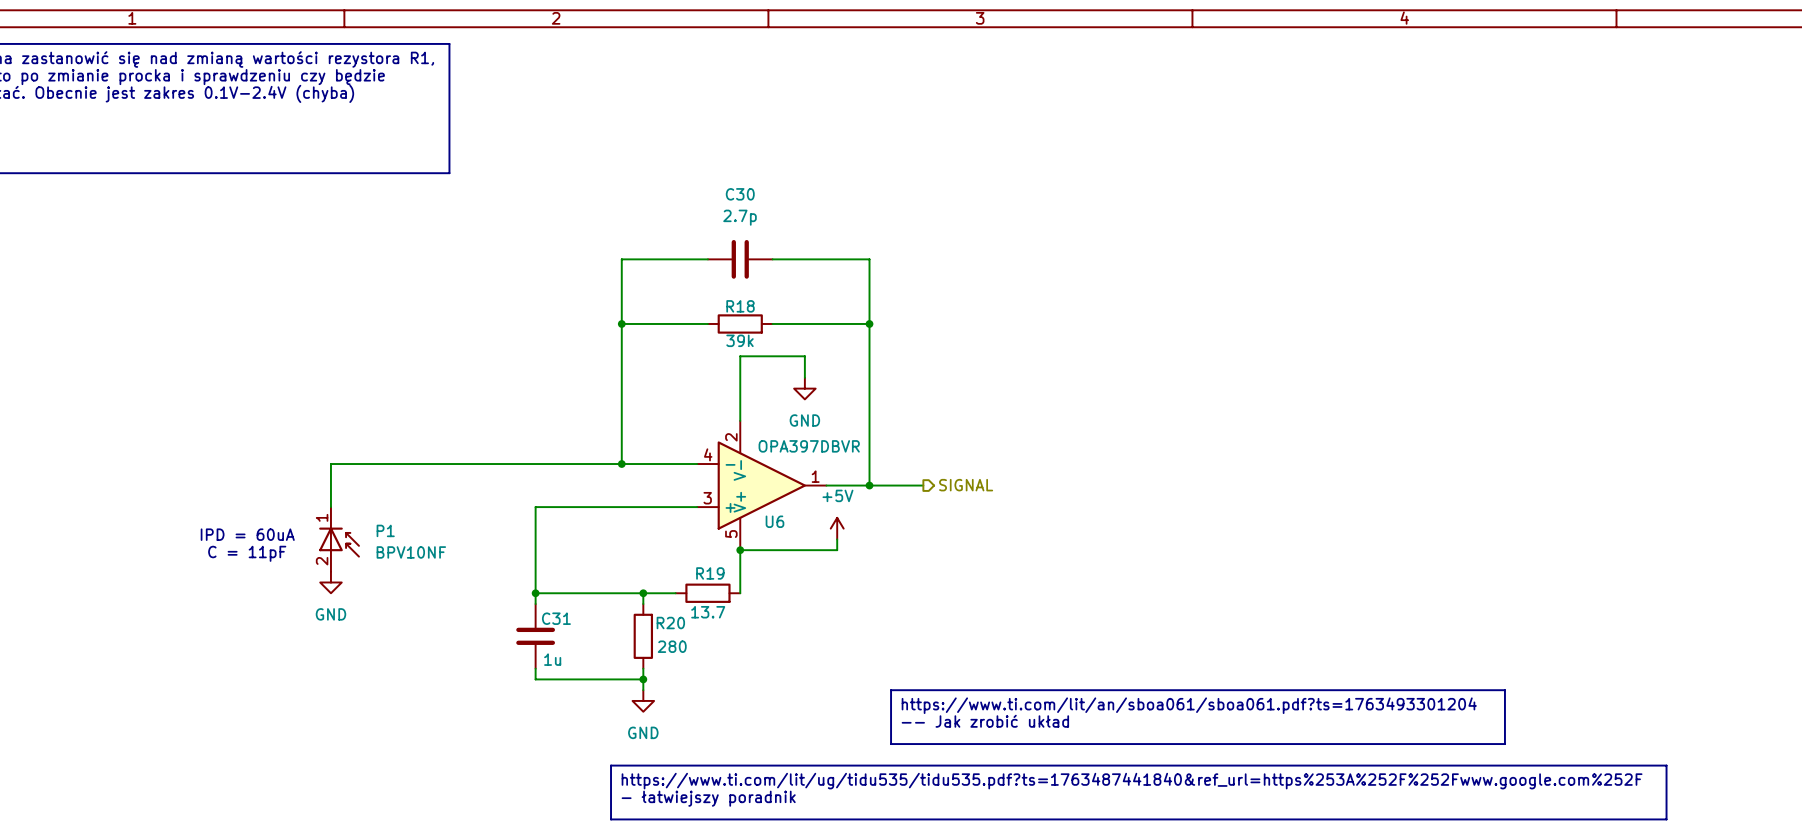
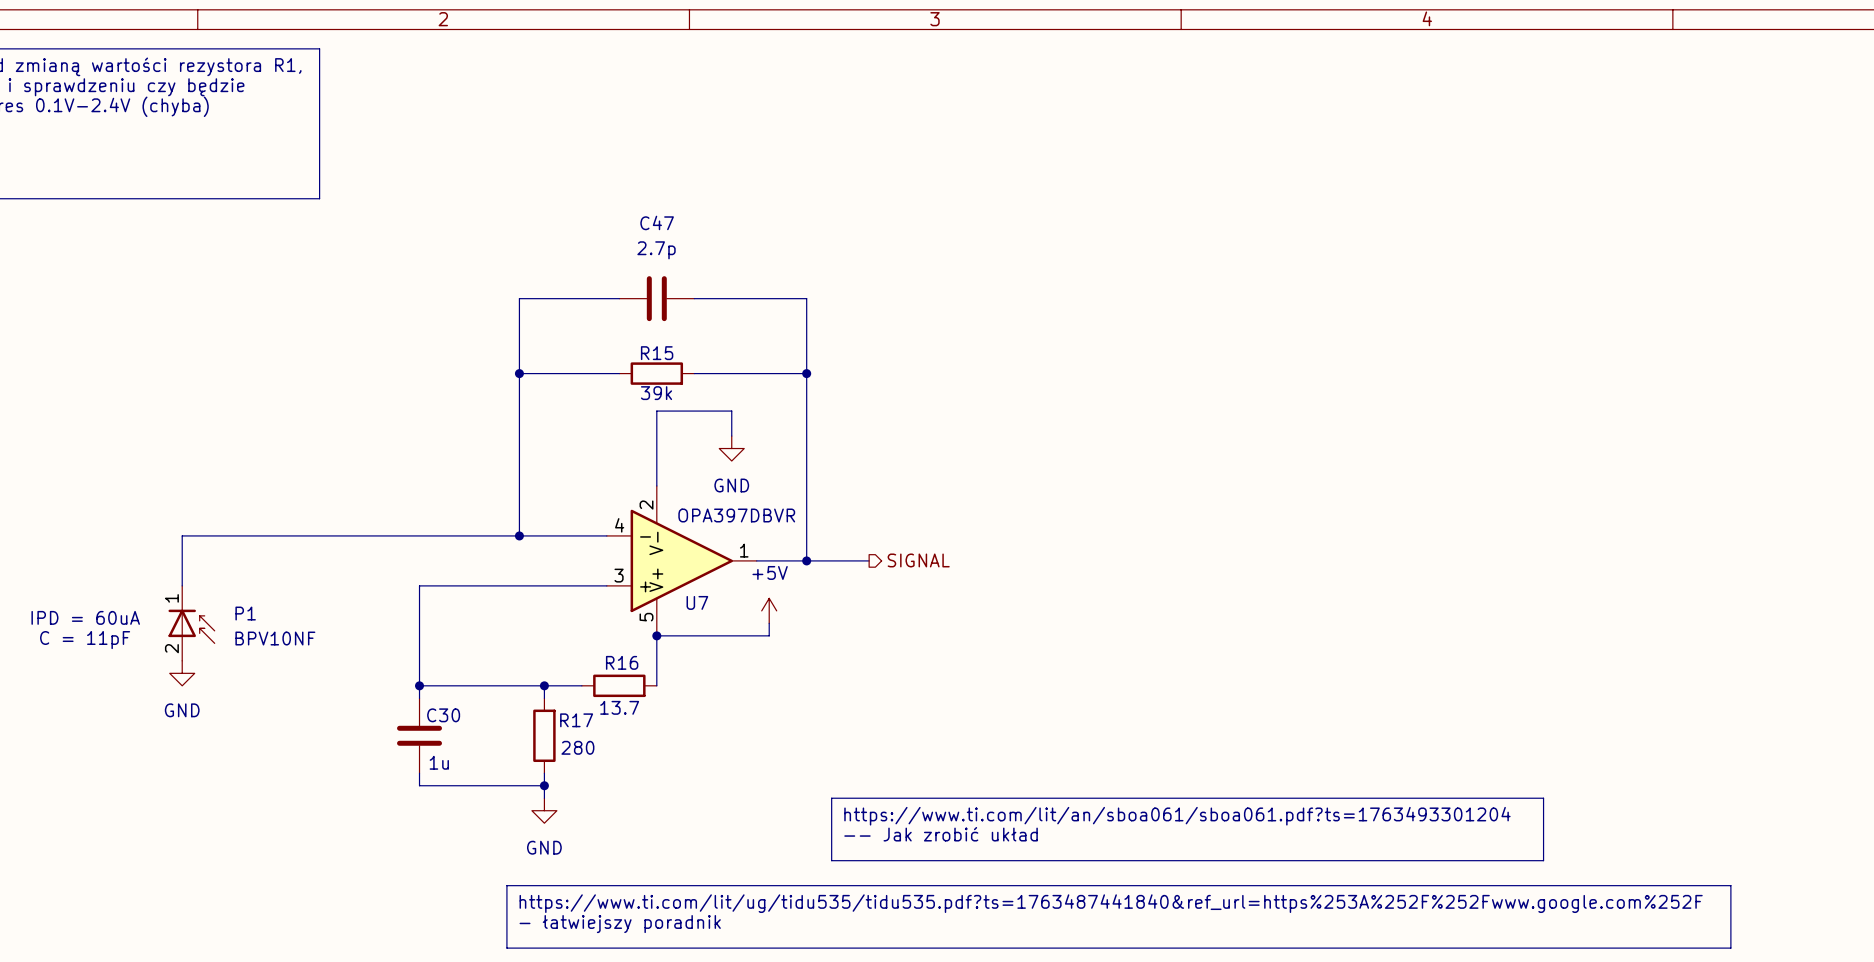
C30 name: C30 (740, 194) -> C47 (657, 222)
R18 name: R18 (740, 306) -> R15 (657, 353)
U6 name: U6 (774, 521) -> U7 (697, 602)
R19 name: R19 (710, 573) -> R16 (622, 662)
C31 name: C31 (556, 618) -> C30 (443, 715)
R20 name: R20 (670, 623) -> R17 (576, 720)

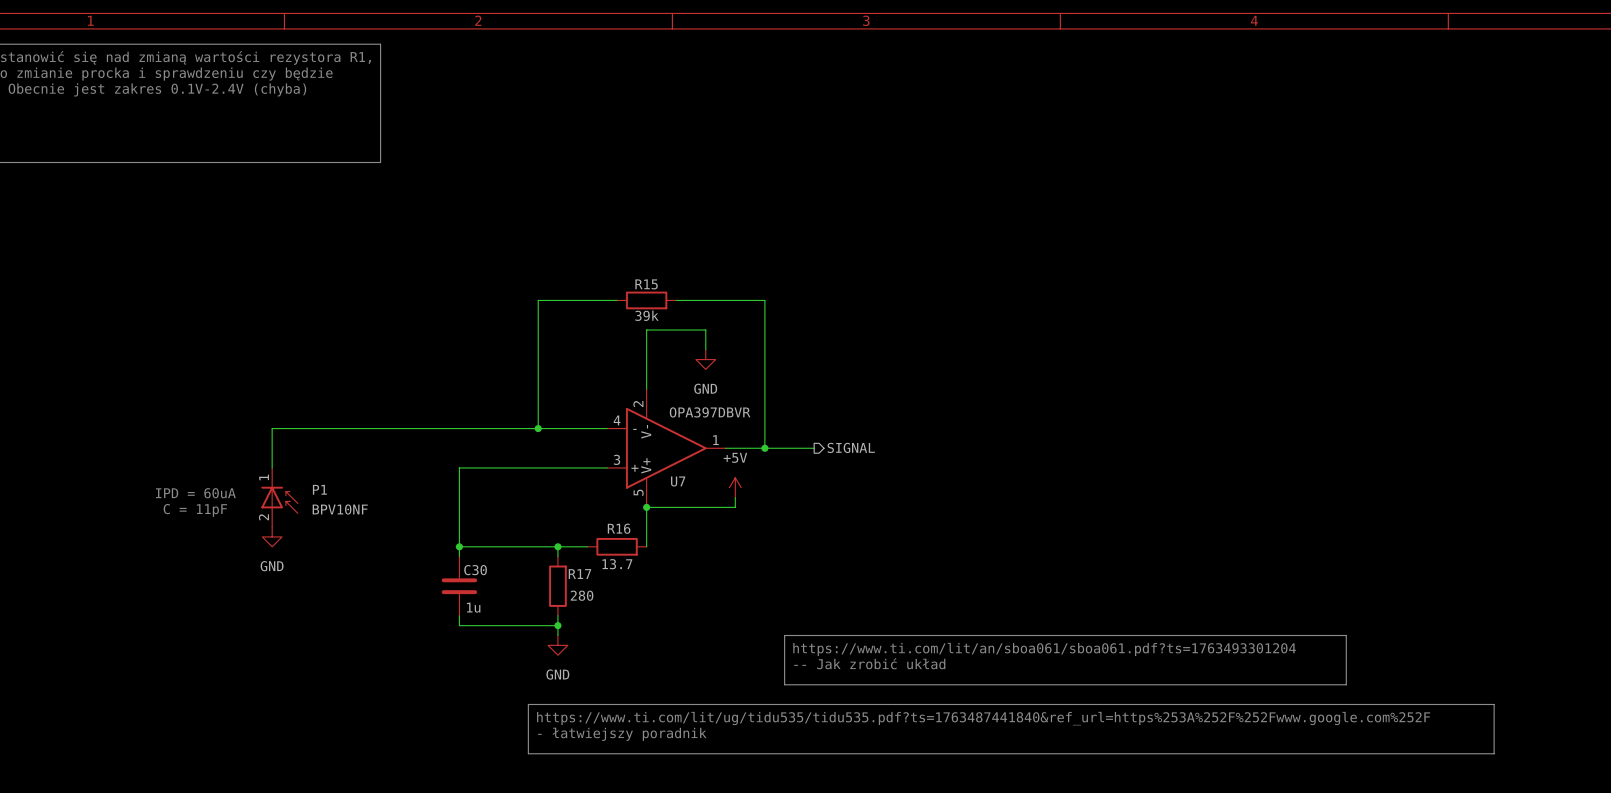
wire: (619, 298) (519, 298) (519, 373) -> none
C47: 2.7p (656, 298) -> none
wire: (694, 298) (806, 298) (806, 373) -> none
junction: (519, 373) -> none
junction: (806, 373) -> none

